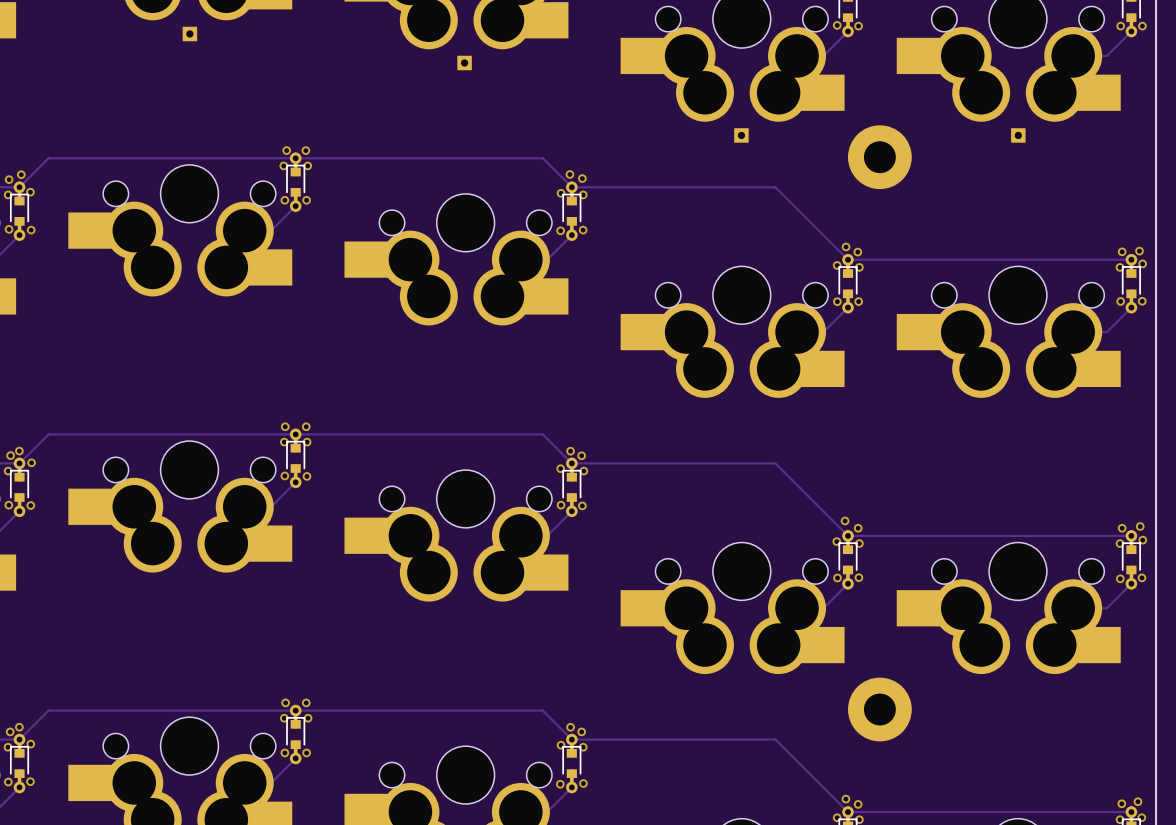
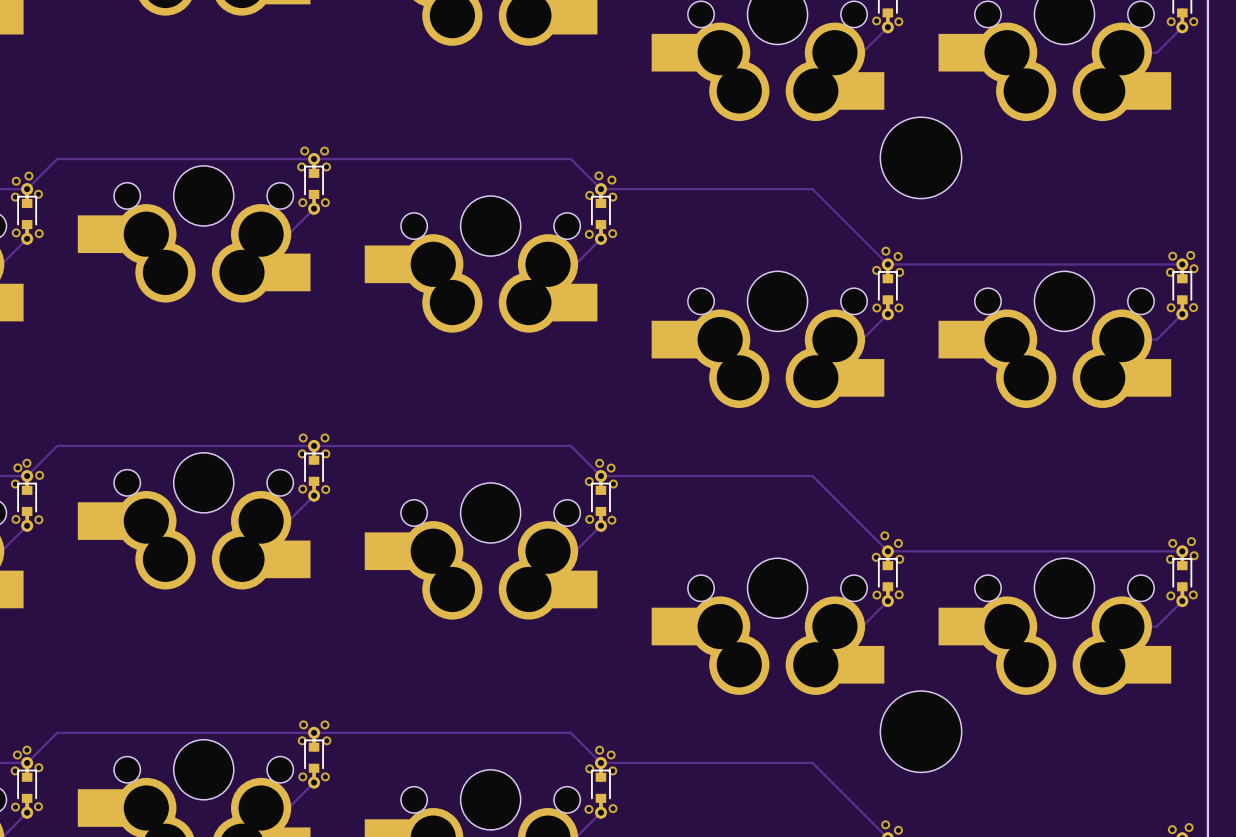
part: (189, 33) -> none
part: (464, 62) -> none
part footprint: [848, 125, 912, 190] -> [880, 117, 962, 199]
part: (741, 135) -> none
part: (1018, 135) -> none
part footprint: [848, 677, 912, 742] -> [880, 691, 962, 773]

